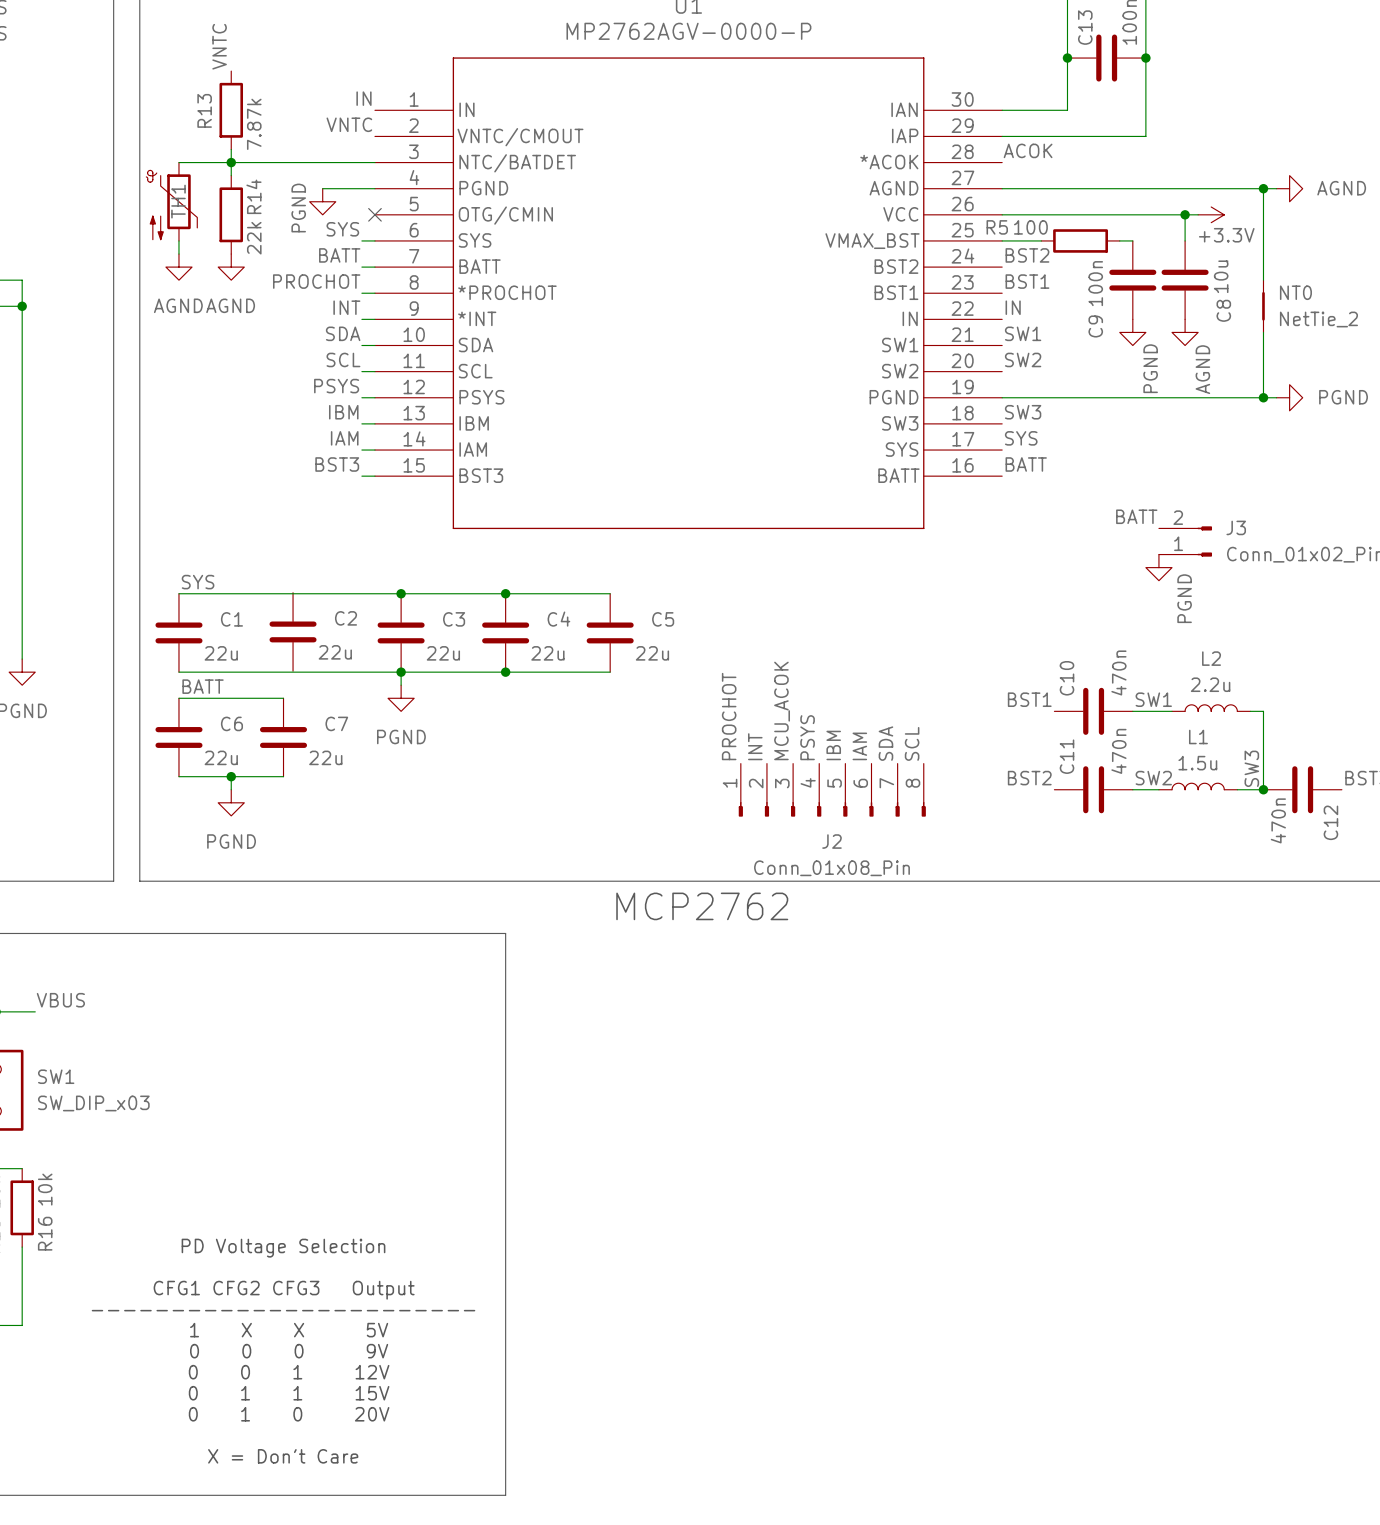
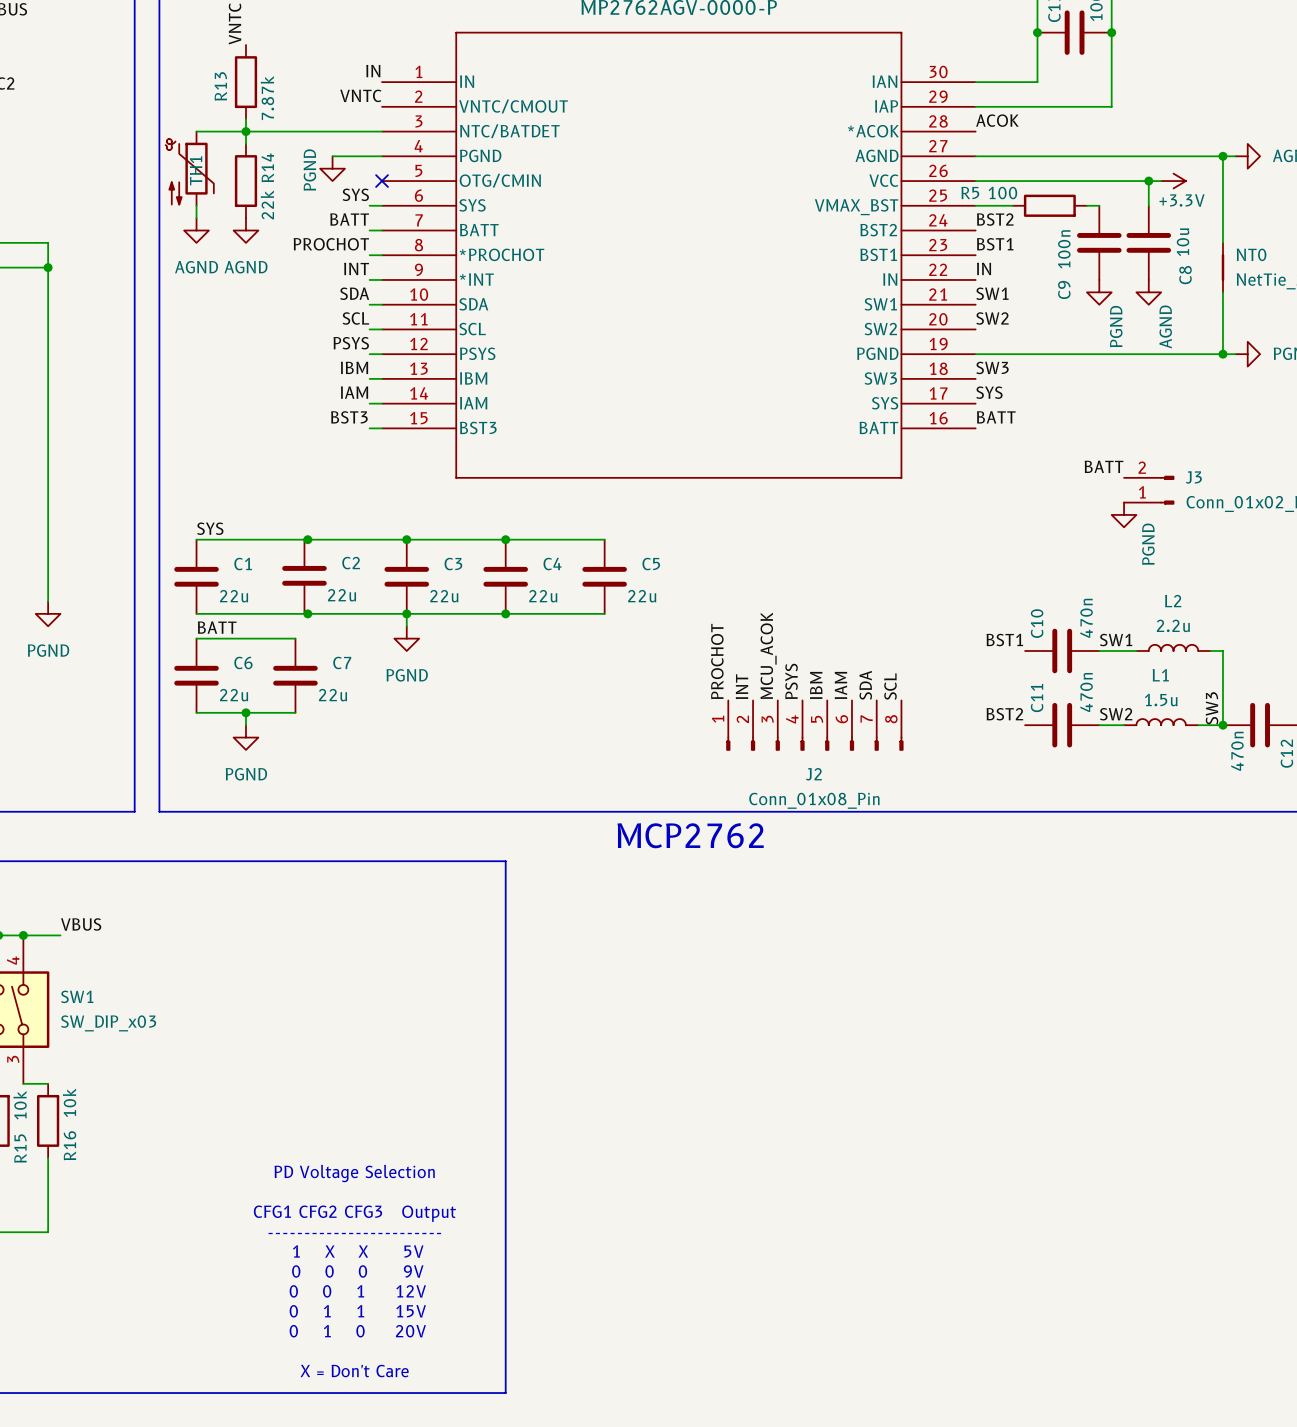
junction: none -> (307, 539)
junction: none -> (307, 613)
text position: PD Voltage Selection (283, 1248) -> PD Voltage Selection (354, 1173)
text position: CFG1 CFG2 CFG3 Output (284, 1290) -> CFG1 CFG2 CFG3 Output (354, 1213)
text position: ------------------------ (283, 1310) -> ------------------------ (354, 1233)
text position: 1 X X 5V (289, 1330) -> 1 X X 5V (358, 1251)
text position: 0 0 0 9V (289, 1351) -> 0 0 0 9V (357, 1271)
text position: 0 0 1 12V (289, 1372) -> 0 0 1 12V (357, 1291)
text position: 0 1 1 15V (289, 1393) -> 0 1 1 15V (357, 1311)
text position: 0 1 0 20V (289, 1414) -> 0 1 0 20V (357, 1331)
text position: X = Don't Care (283, 1456) -> X = Don't Care (354, 1371)

